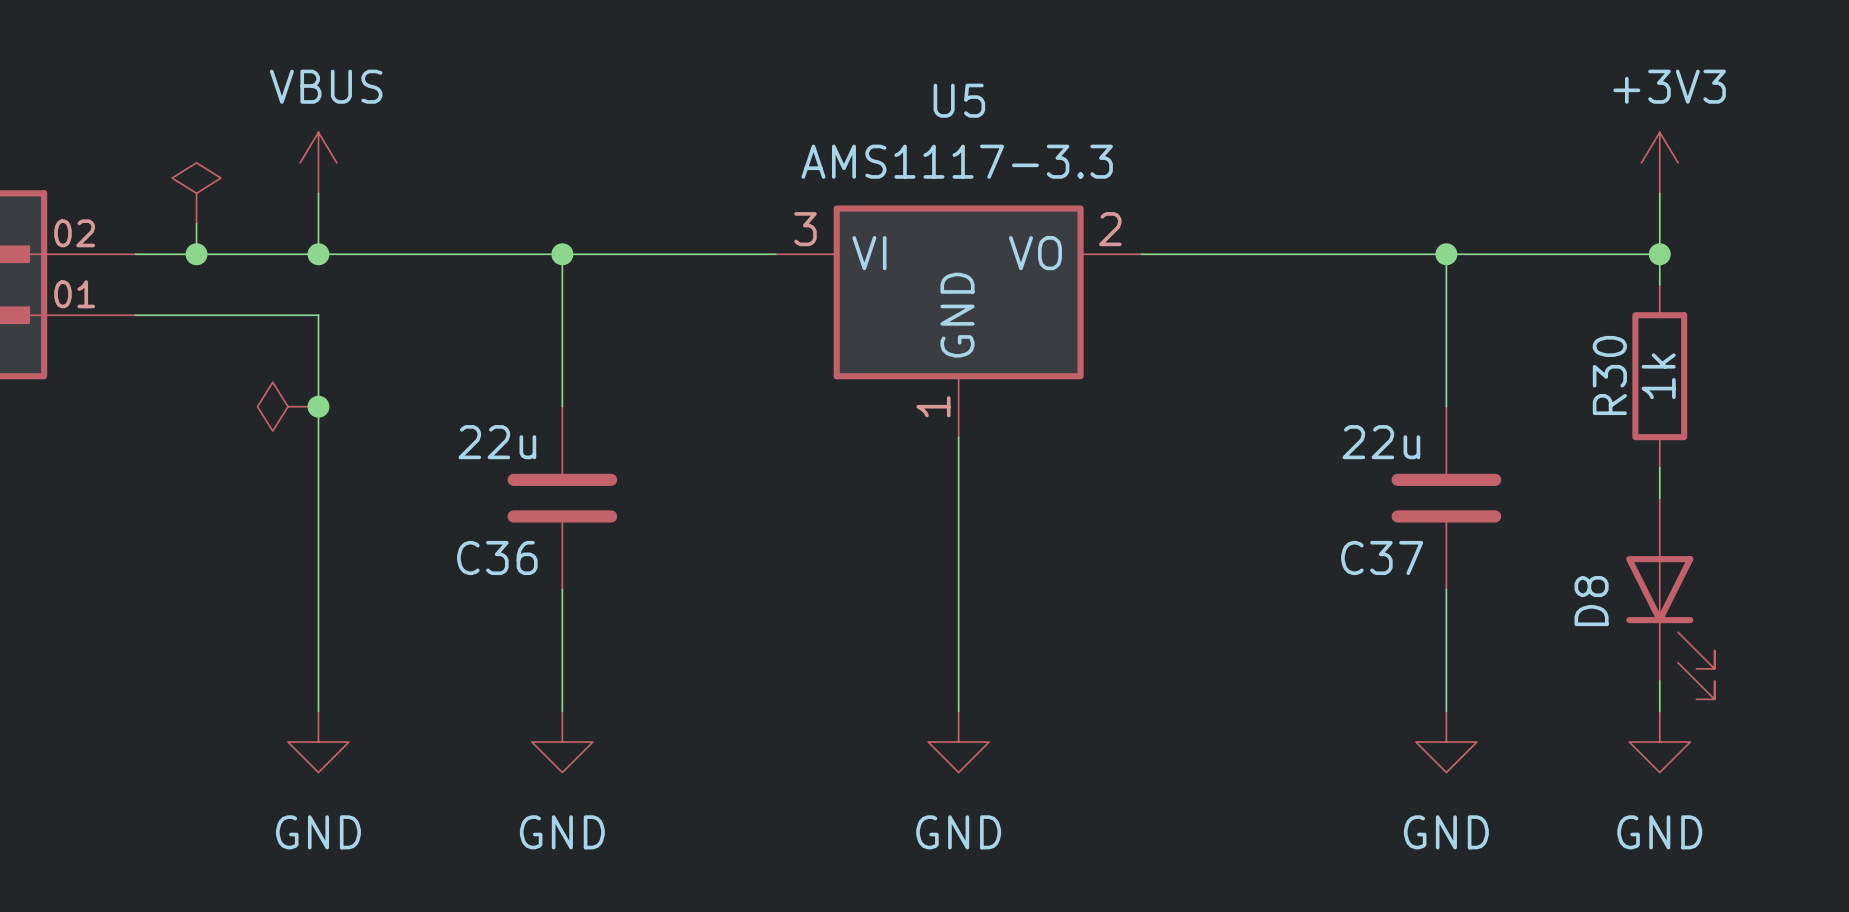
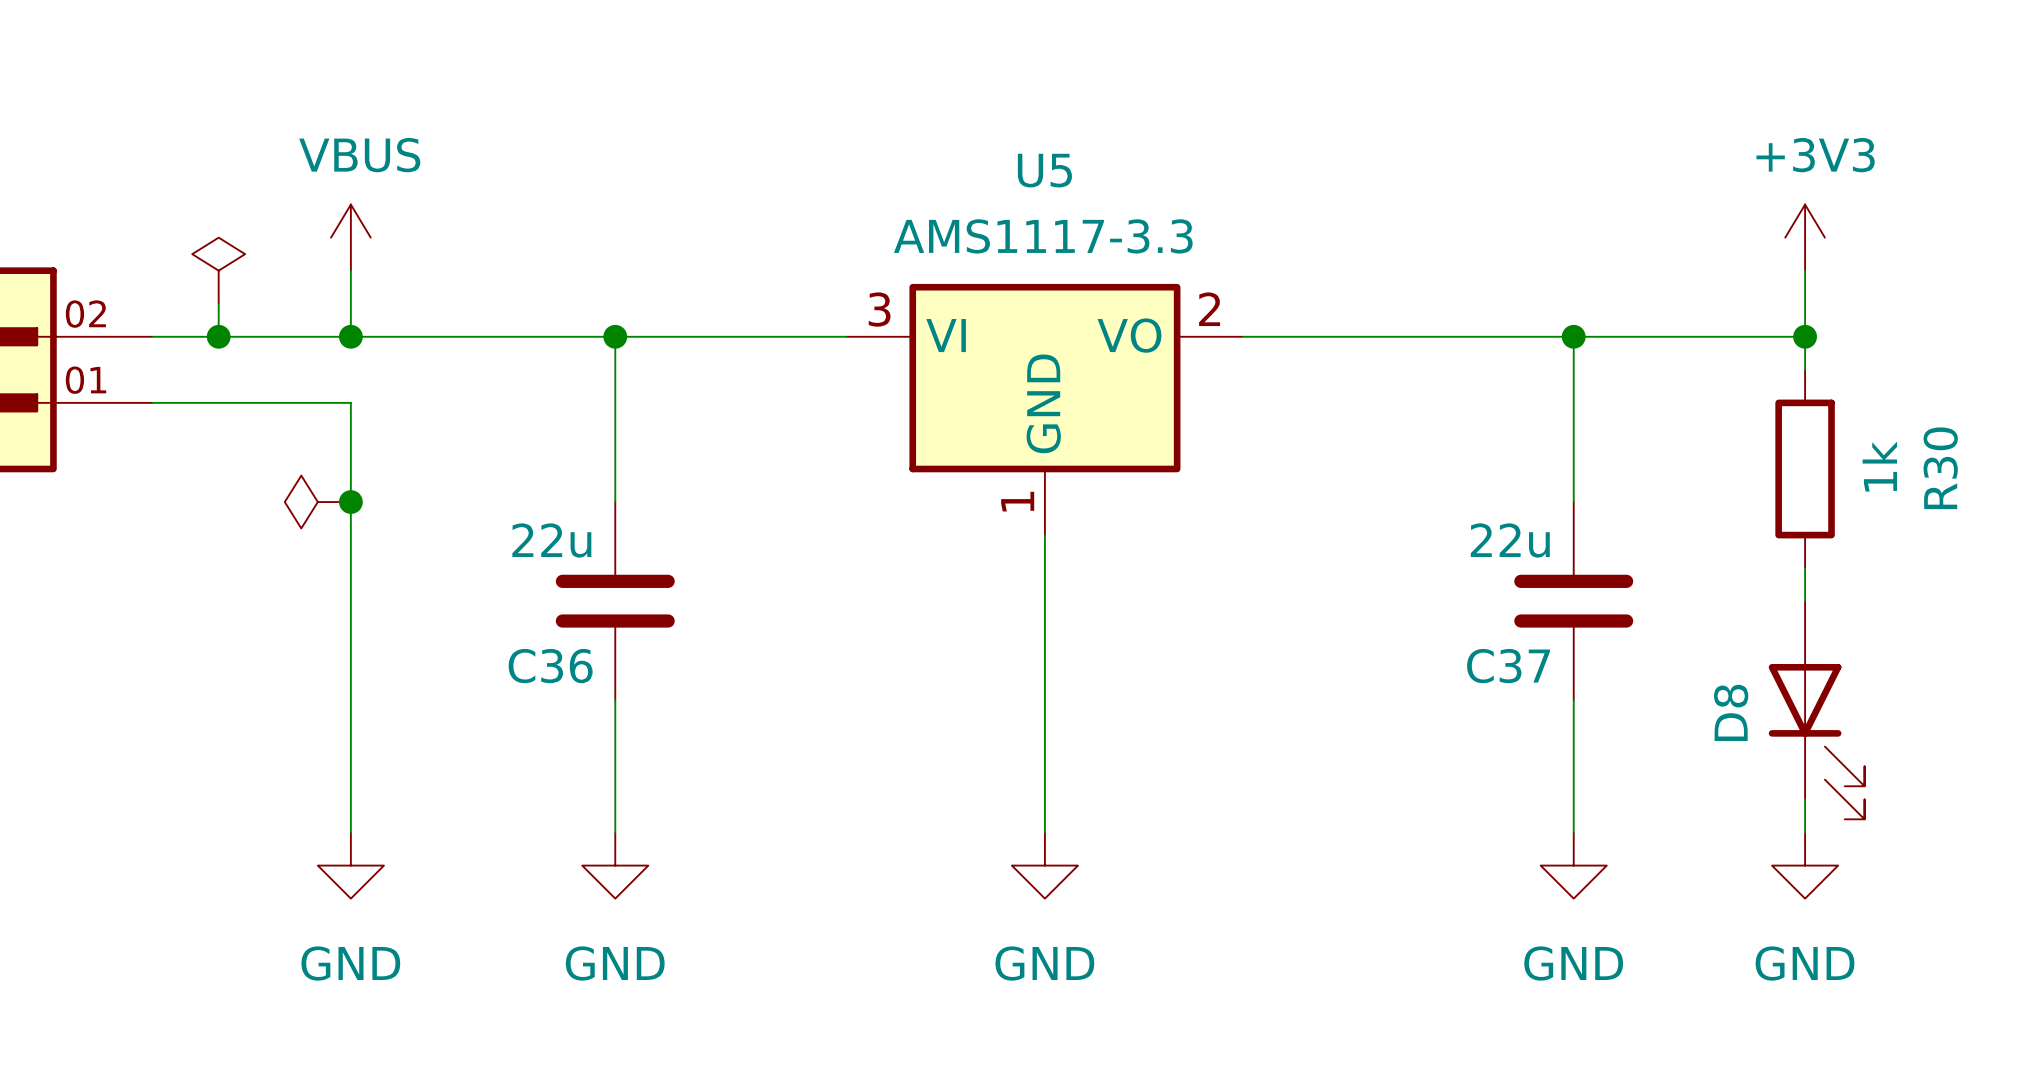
R30 name position: R30 (1609, 375) -> R30 (1940, 468)
R30 value position: 1k (1658, 376) -> 1k (1879, 466)

